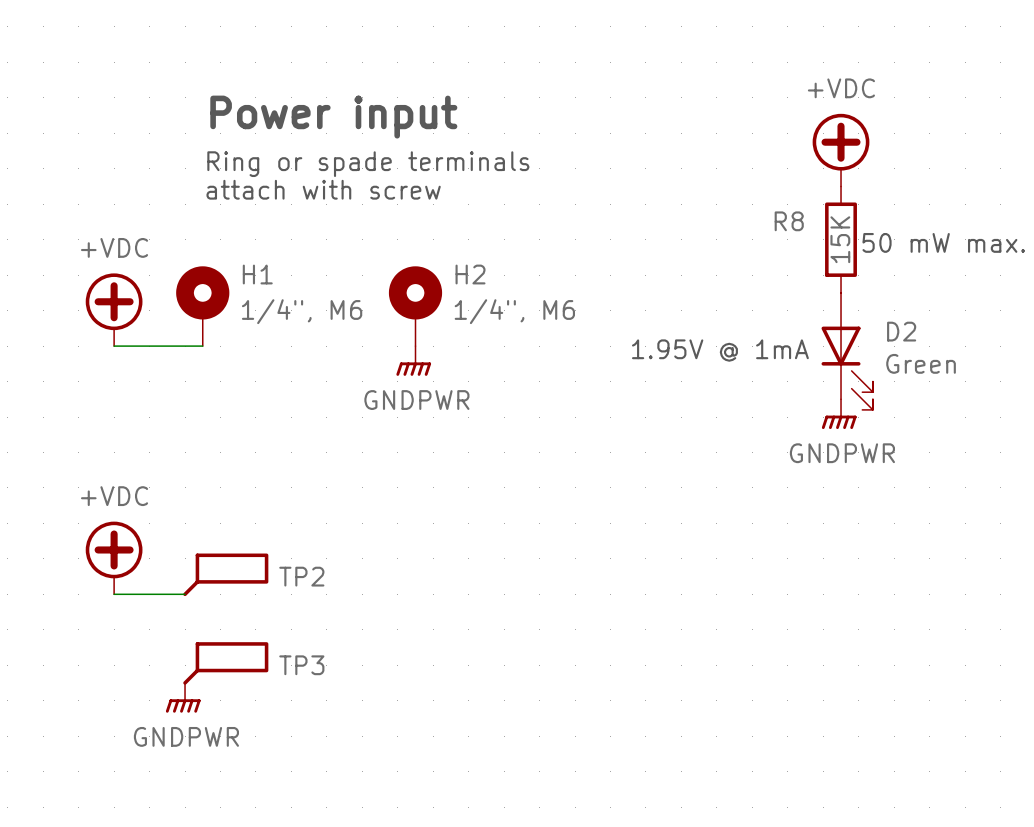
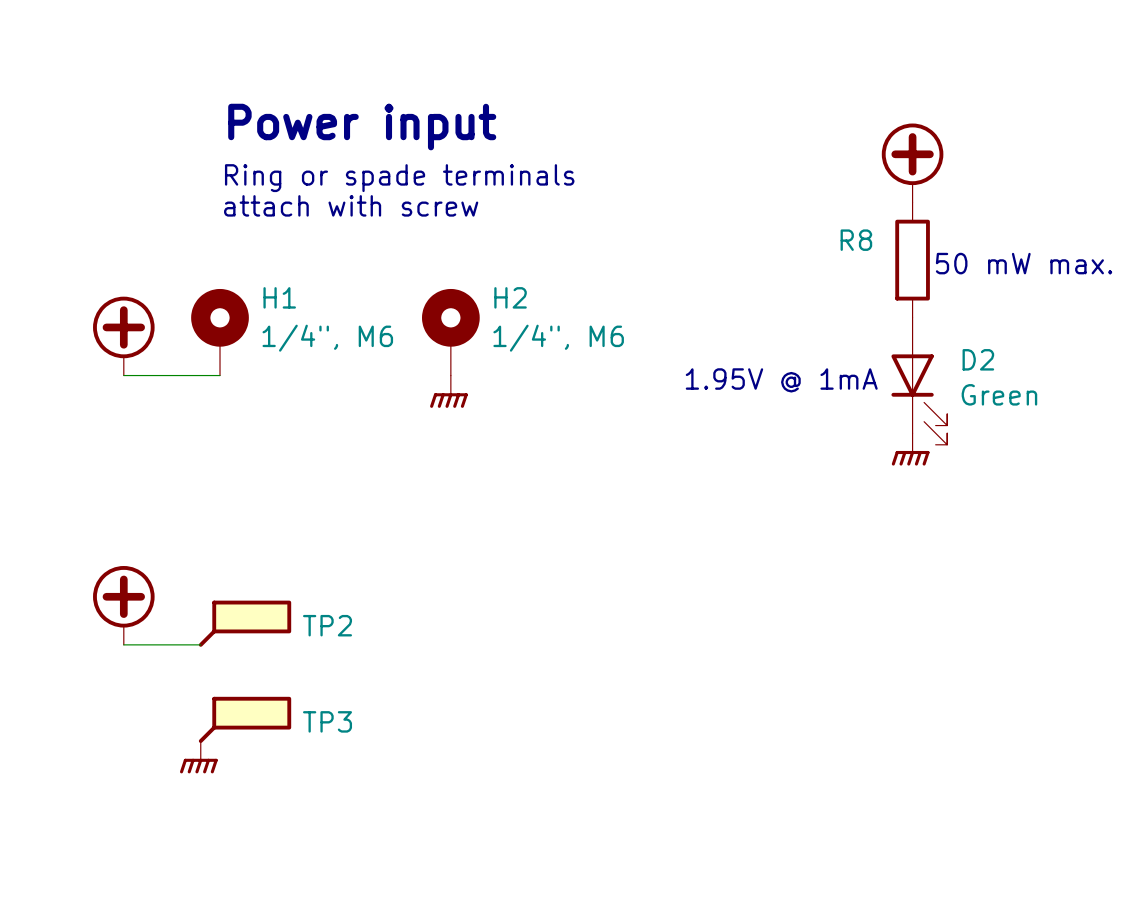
power symbol text: +VDC (841, 88) -> none
R8 value: 15K (840, 239) -> none
power symbol text: +VDC (114, 247) -> none
power symbol text: GNDPWR (416, 400) -> none
power symbol text: GNDPWR (842, 453) -> none
power symbol text: +VDC (114, 496) -> none
power symbol text: GNDPWR (186, 736) -> none

